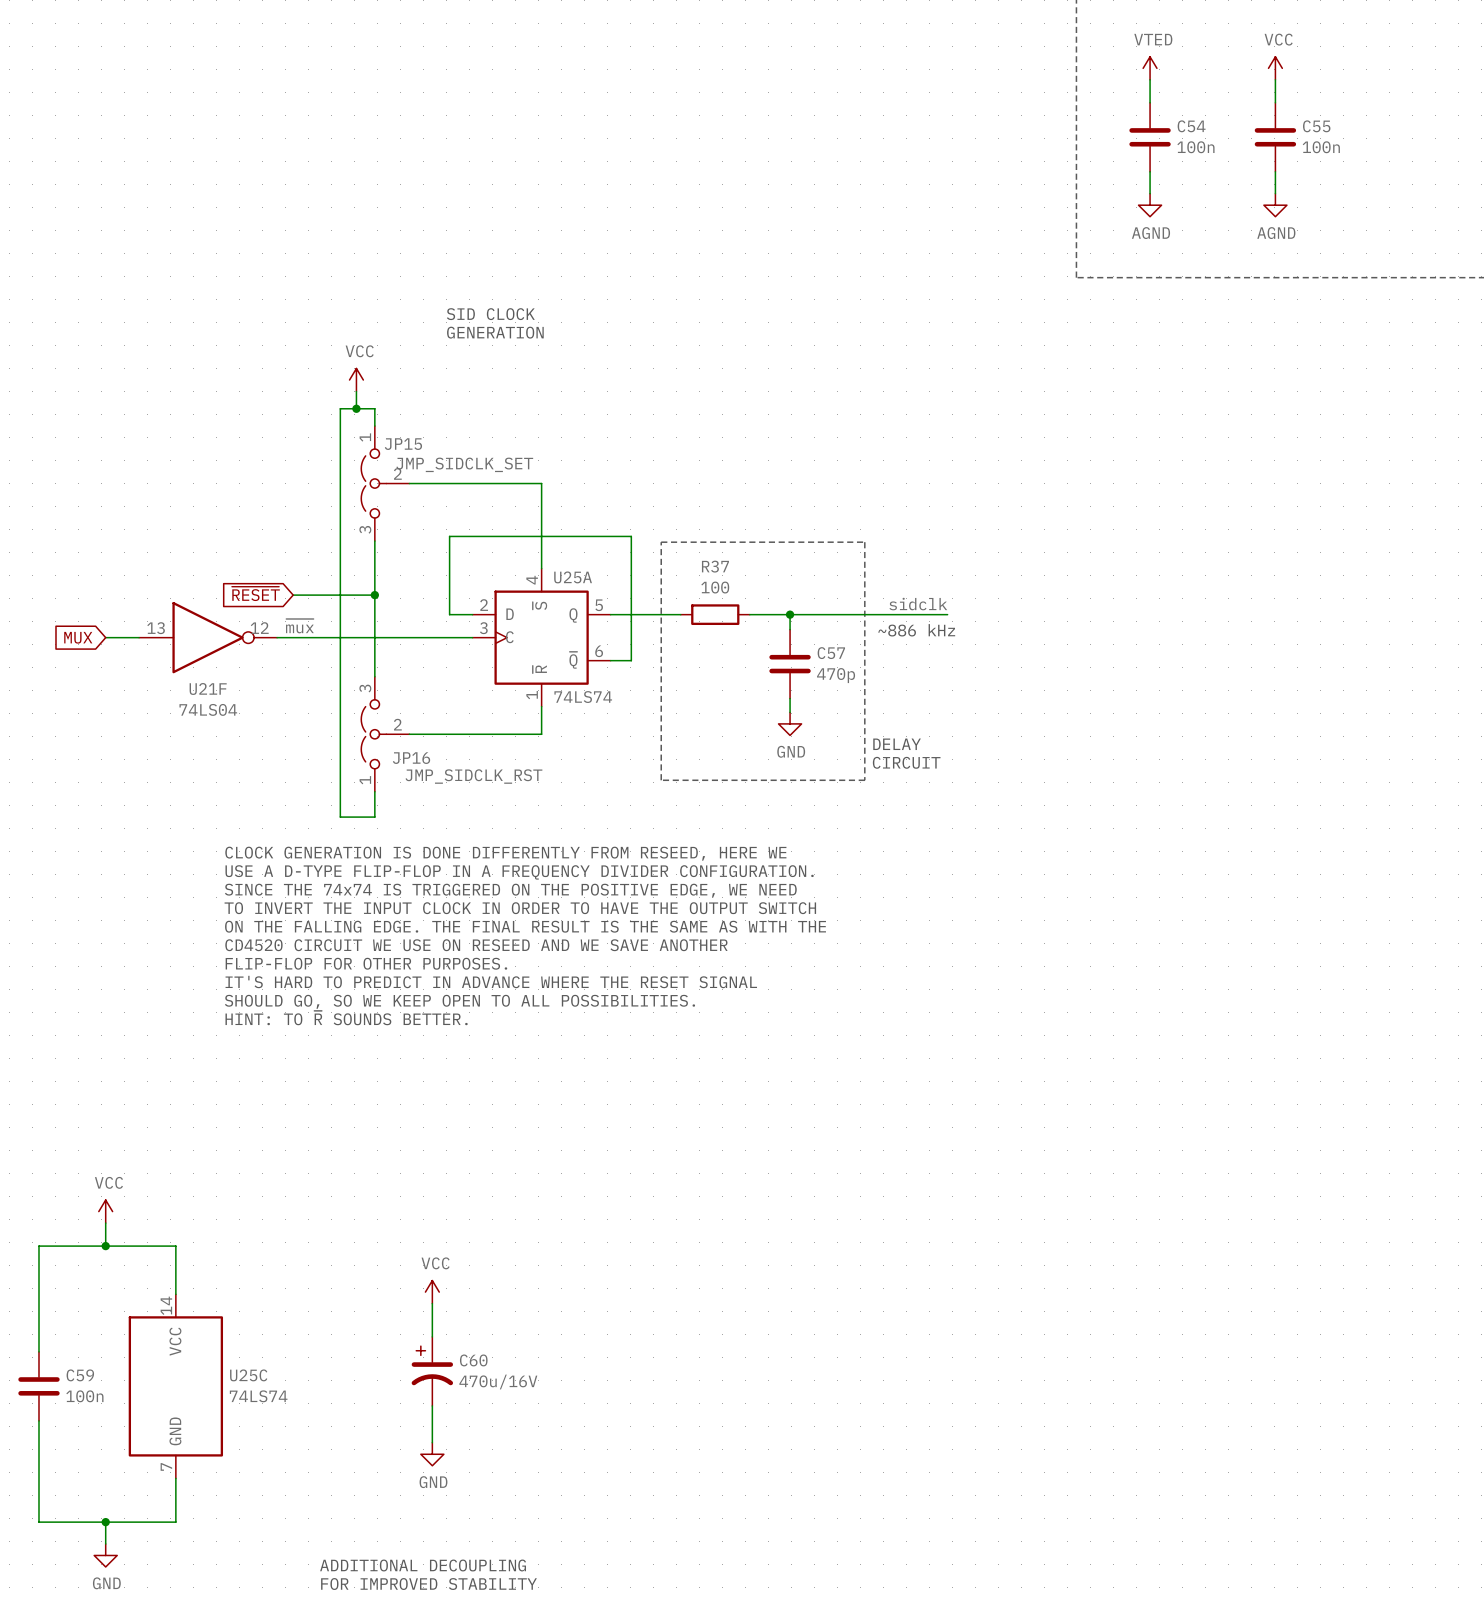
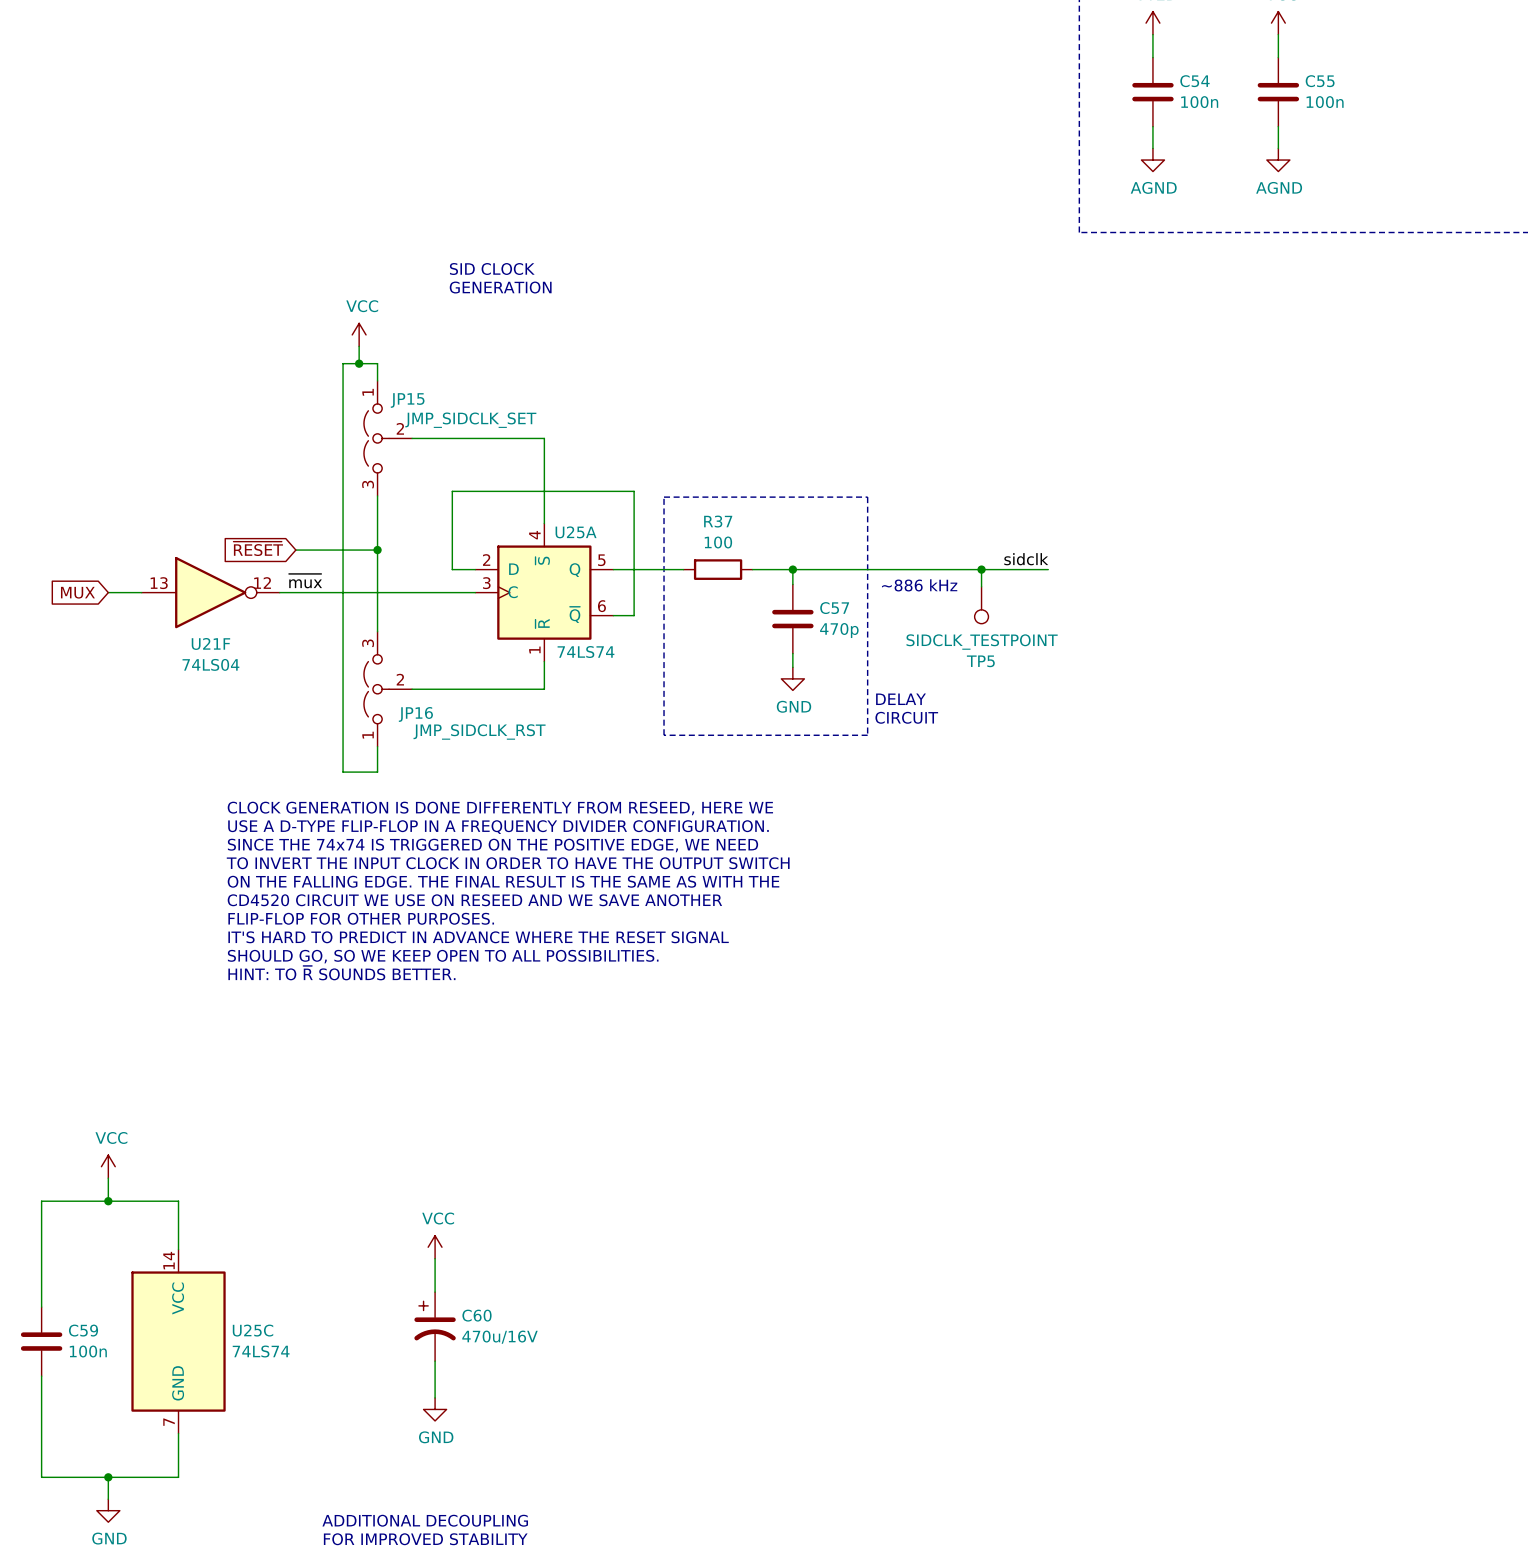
label position: sidclk (918, 604) -> sidclk (1026, 559)
wire: none -> (950, 569) (1048, 569)
wire: none -> (981, 569) (981, 586)
junction: none -> (981, 569)
TP5: none -> SIDCLK_TESTPOINT (981, 605)

